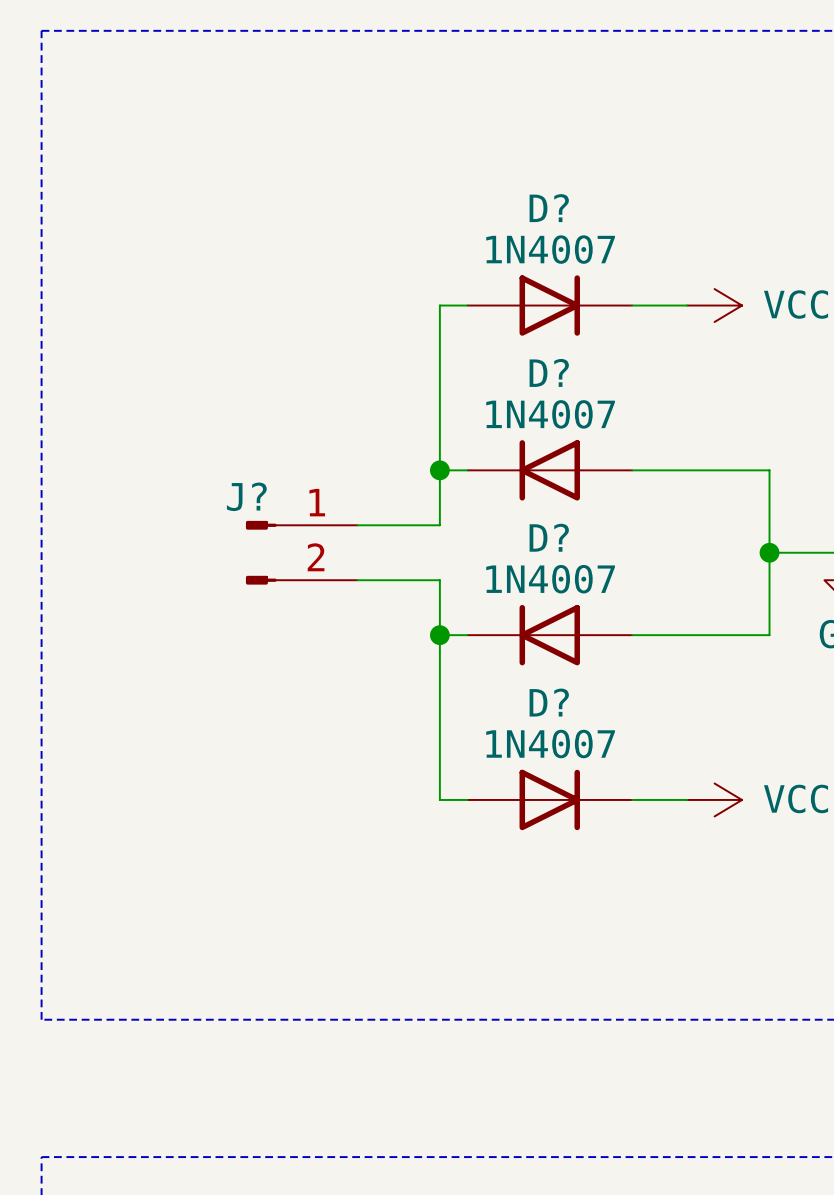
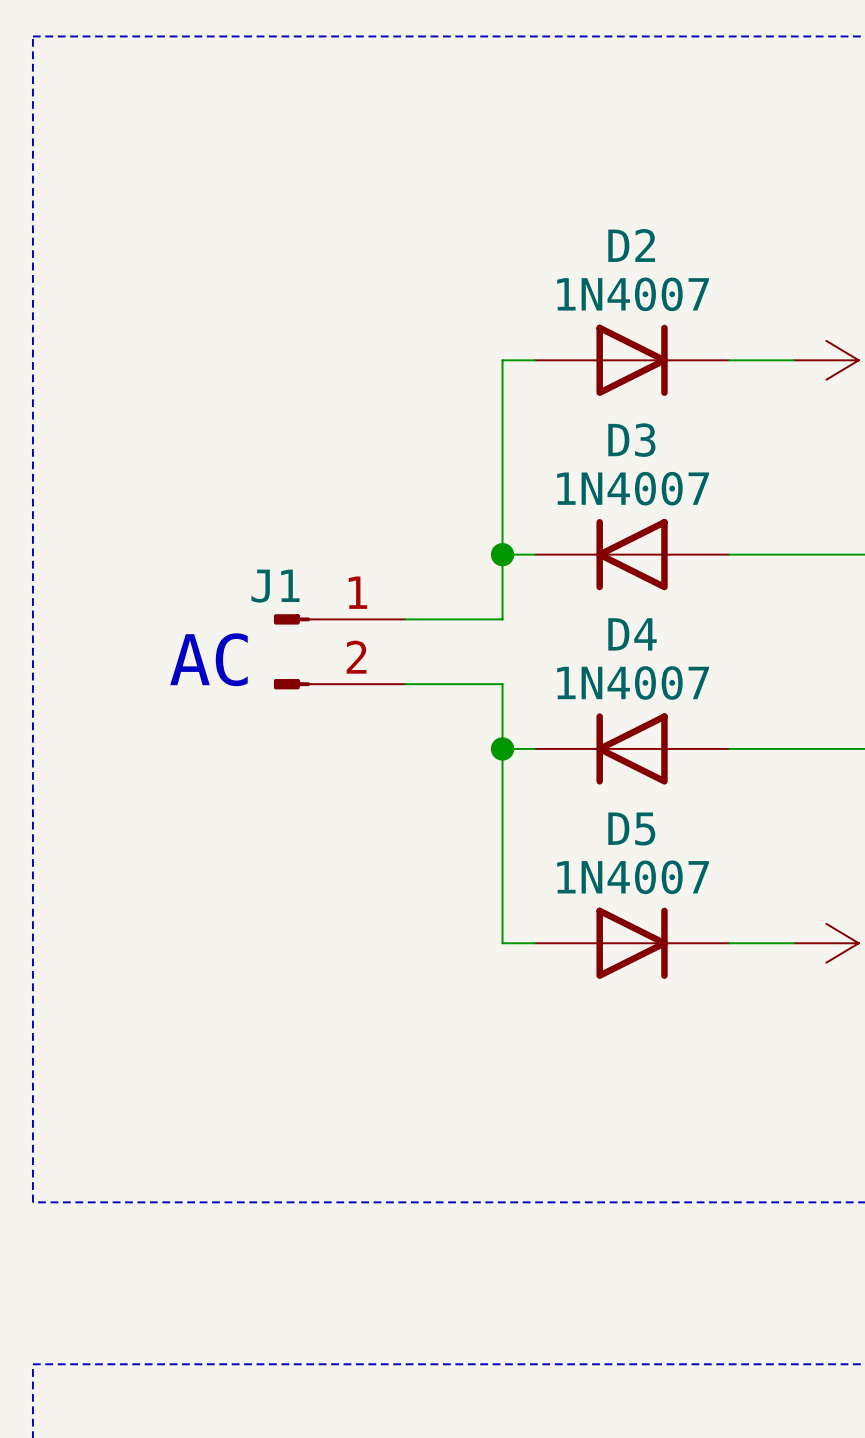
D? name: D? (549, 208) -> D2 (631, 245)
D? name: D? (549, 372) -> D3 (631, 440)
J? name: J? (246, 496) -> J1 (275, 586)
D? name: D? (549, 537) -> D4 (632, 634)
text: none -> AC (208, 659)
D? name: D? (549, 702) -> D5 (631, 829)

